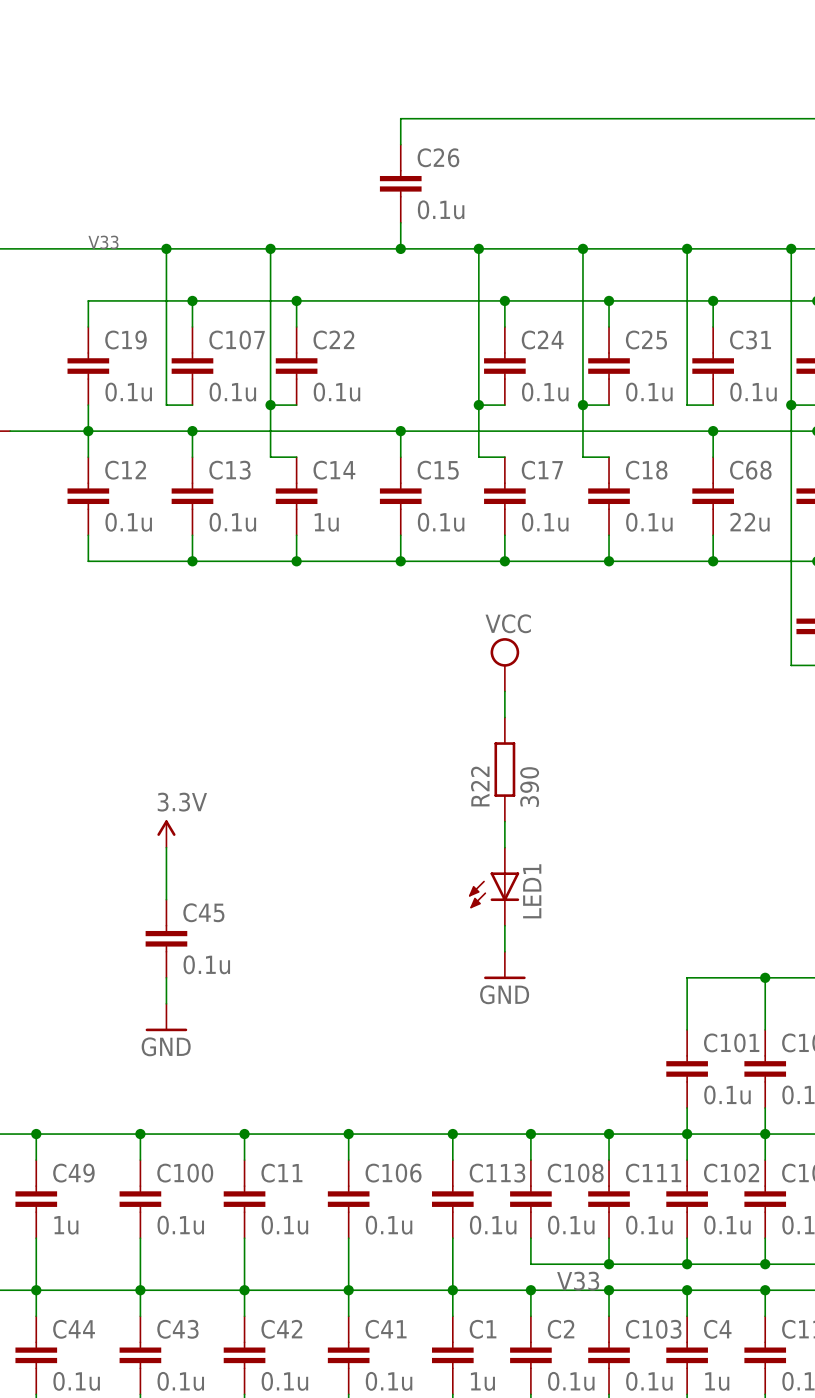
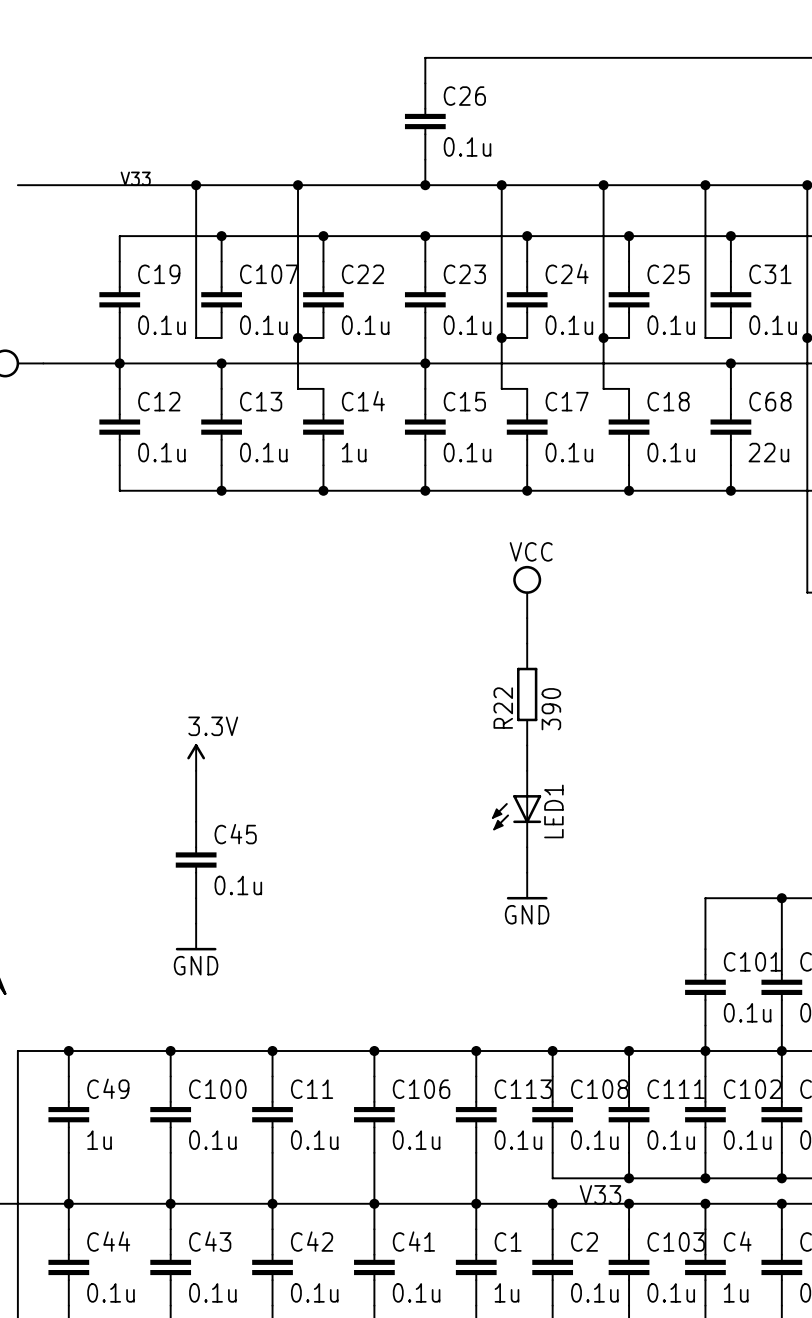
wire: none -> (425, 236) (425, 261)
junction: none -> (425, 236)
C23: none -> 0.1u (425, 299)
wire: none -> (425, 337) (425, 363)

